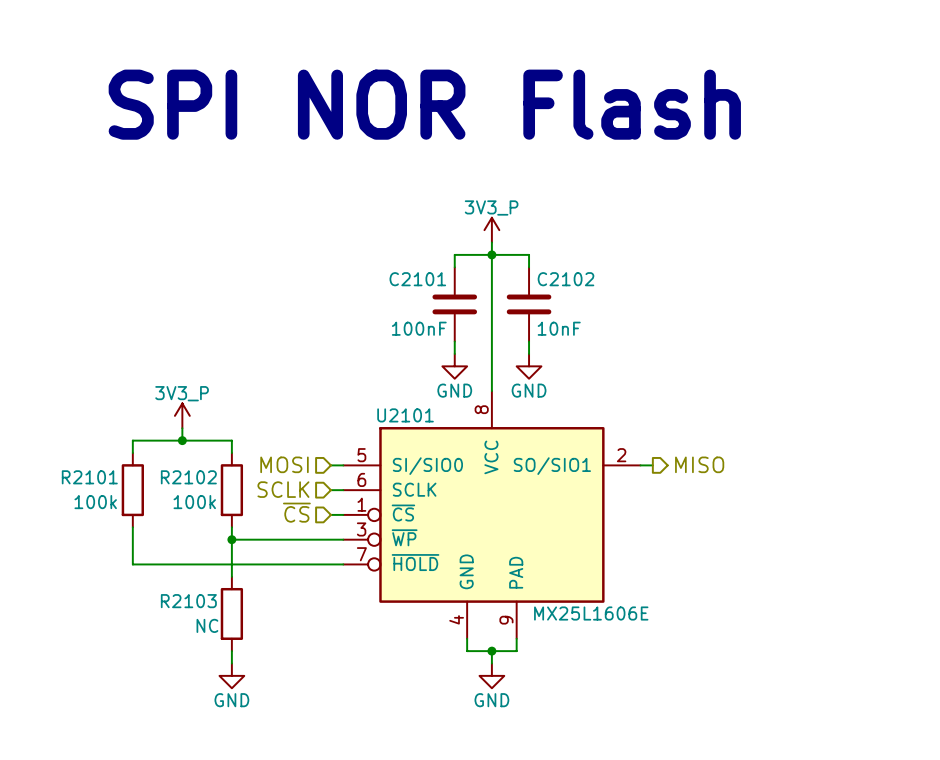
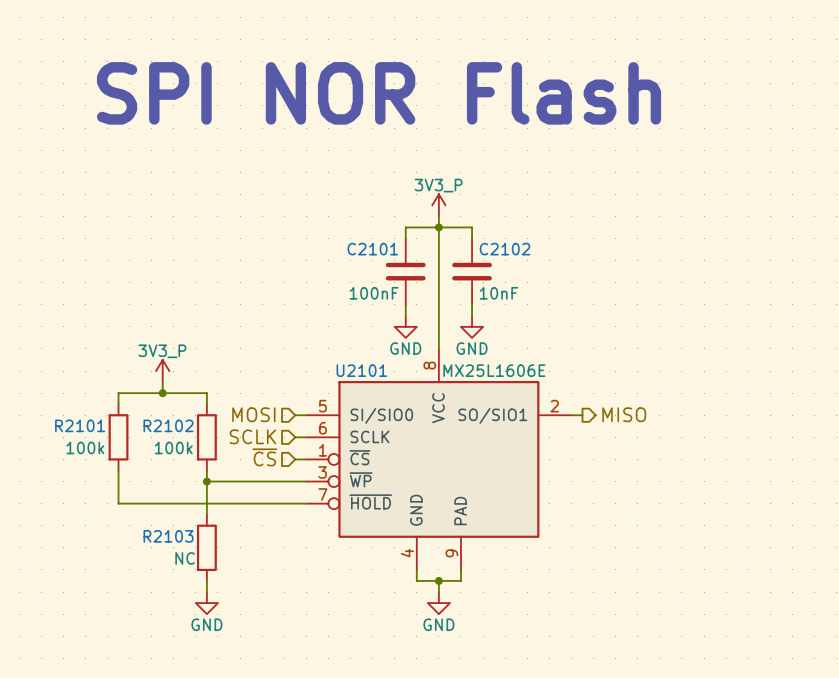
U2101 value position: MX25L1606E (591, 613) -> MX25L1606E (494, 370)

